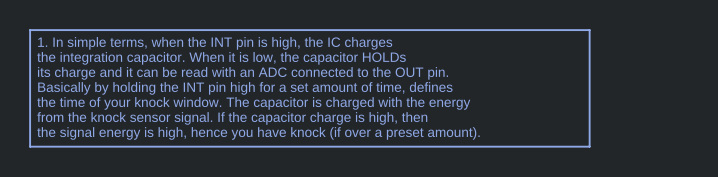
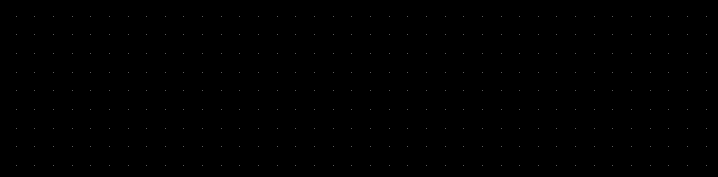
line: (30, 30) (589, 30) (589, 146) (30, 146) (30, 30) -> none
text: 1. In simple terms, when the INT pin is high, the IC charges (215, 43) -> none
text: the integration capacitor. When it is low, the capacitor HOLDs (221, 58) -> none
text: its charge and it can be read with an ADC connected to the OUT pin. (243, 73) -> none
text: Basically by holding the INT pin high for a set amount of time, defines (245, 88) -> none
text: the time of your knock window. The capacitor is charged with the energy (253, 103) -> none
text: from the knock sensor signal. If the capacitor charge is high, then (232, 118) -> none
text: the signal energy is high, hence you have knock (if over a preset amount). (258, 133) -> none

